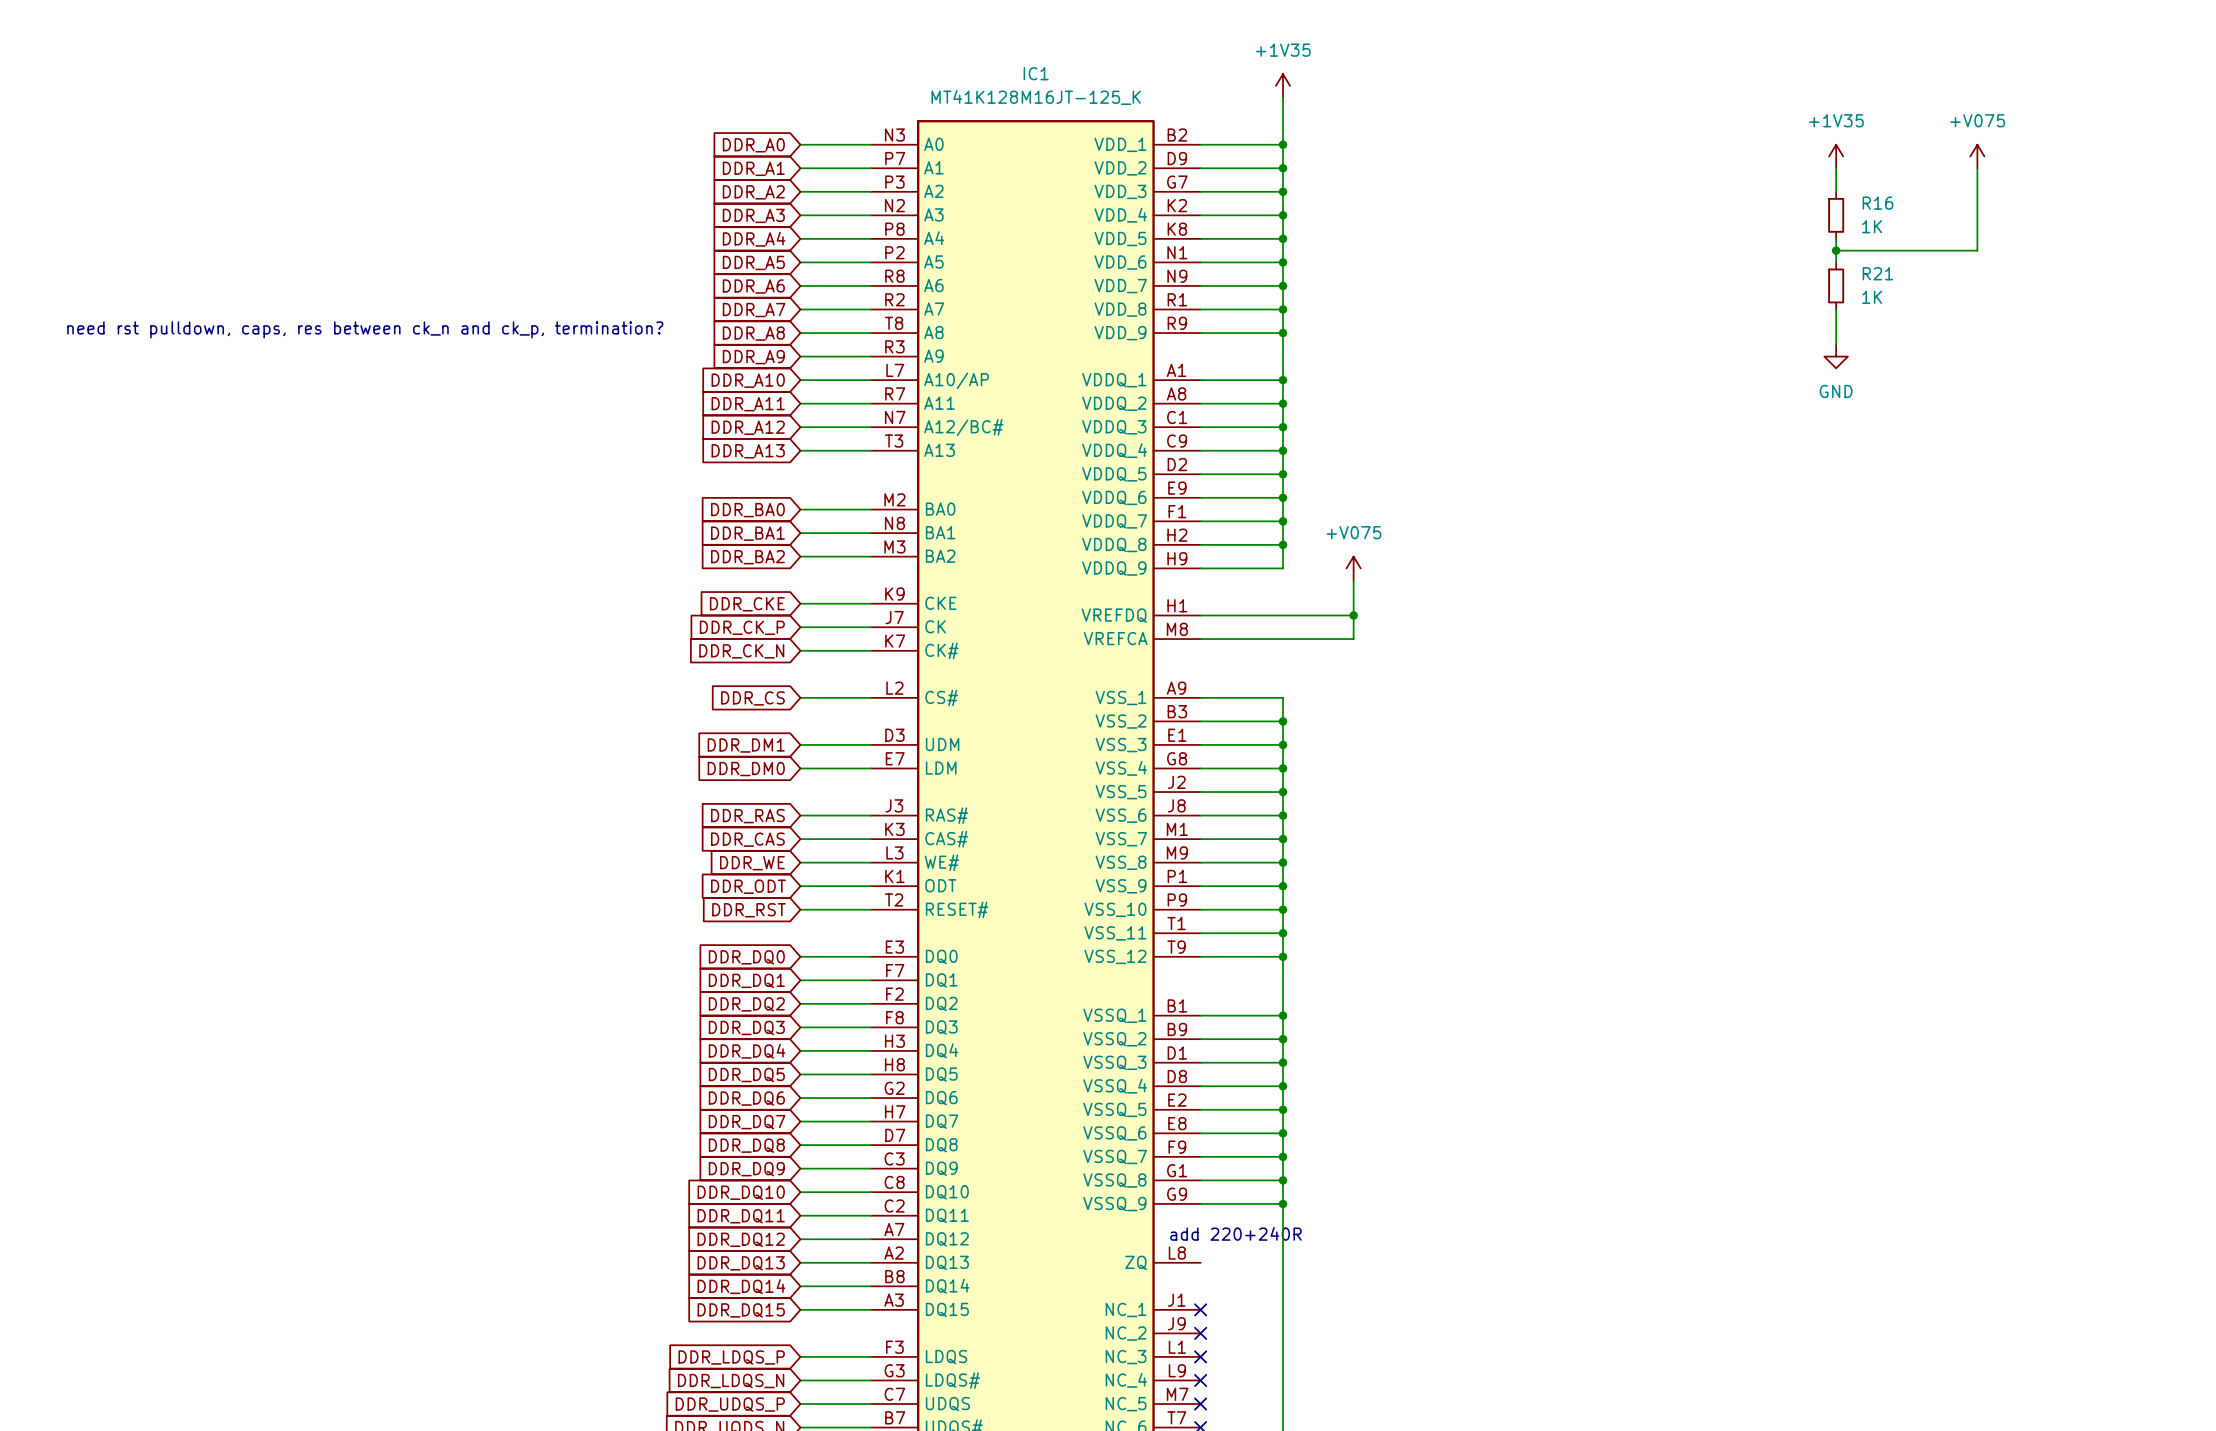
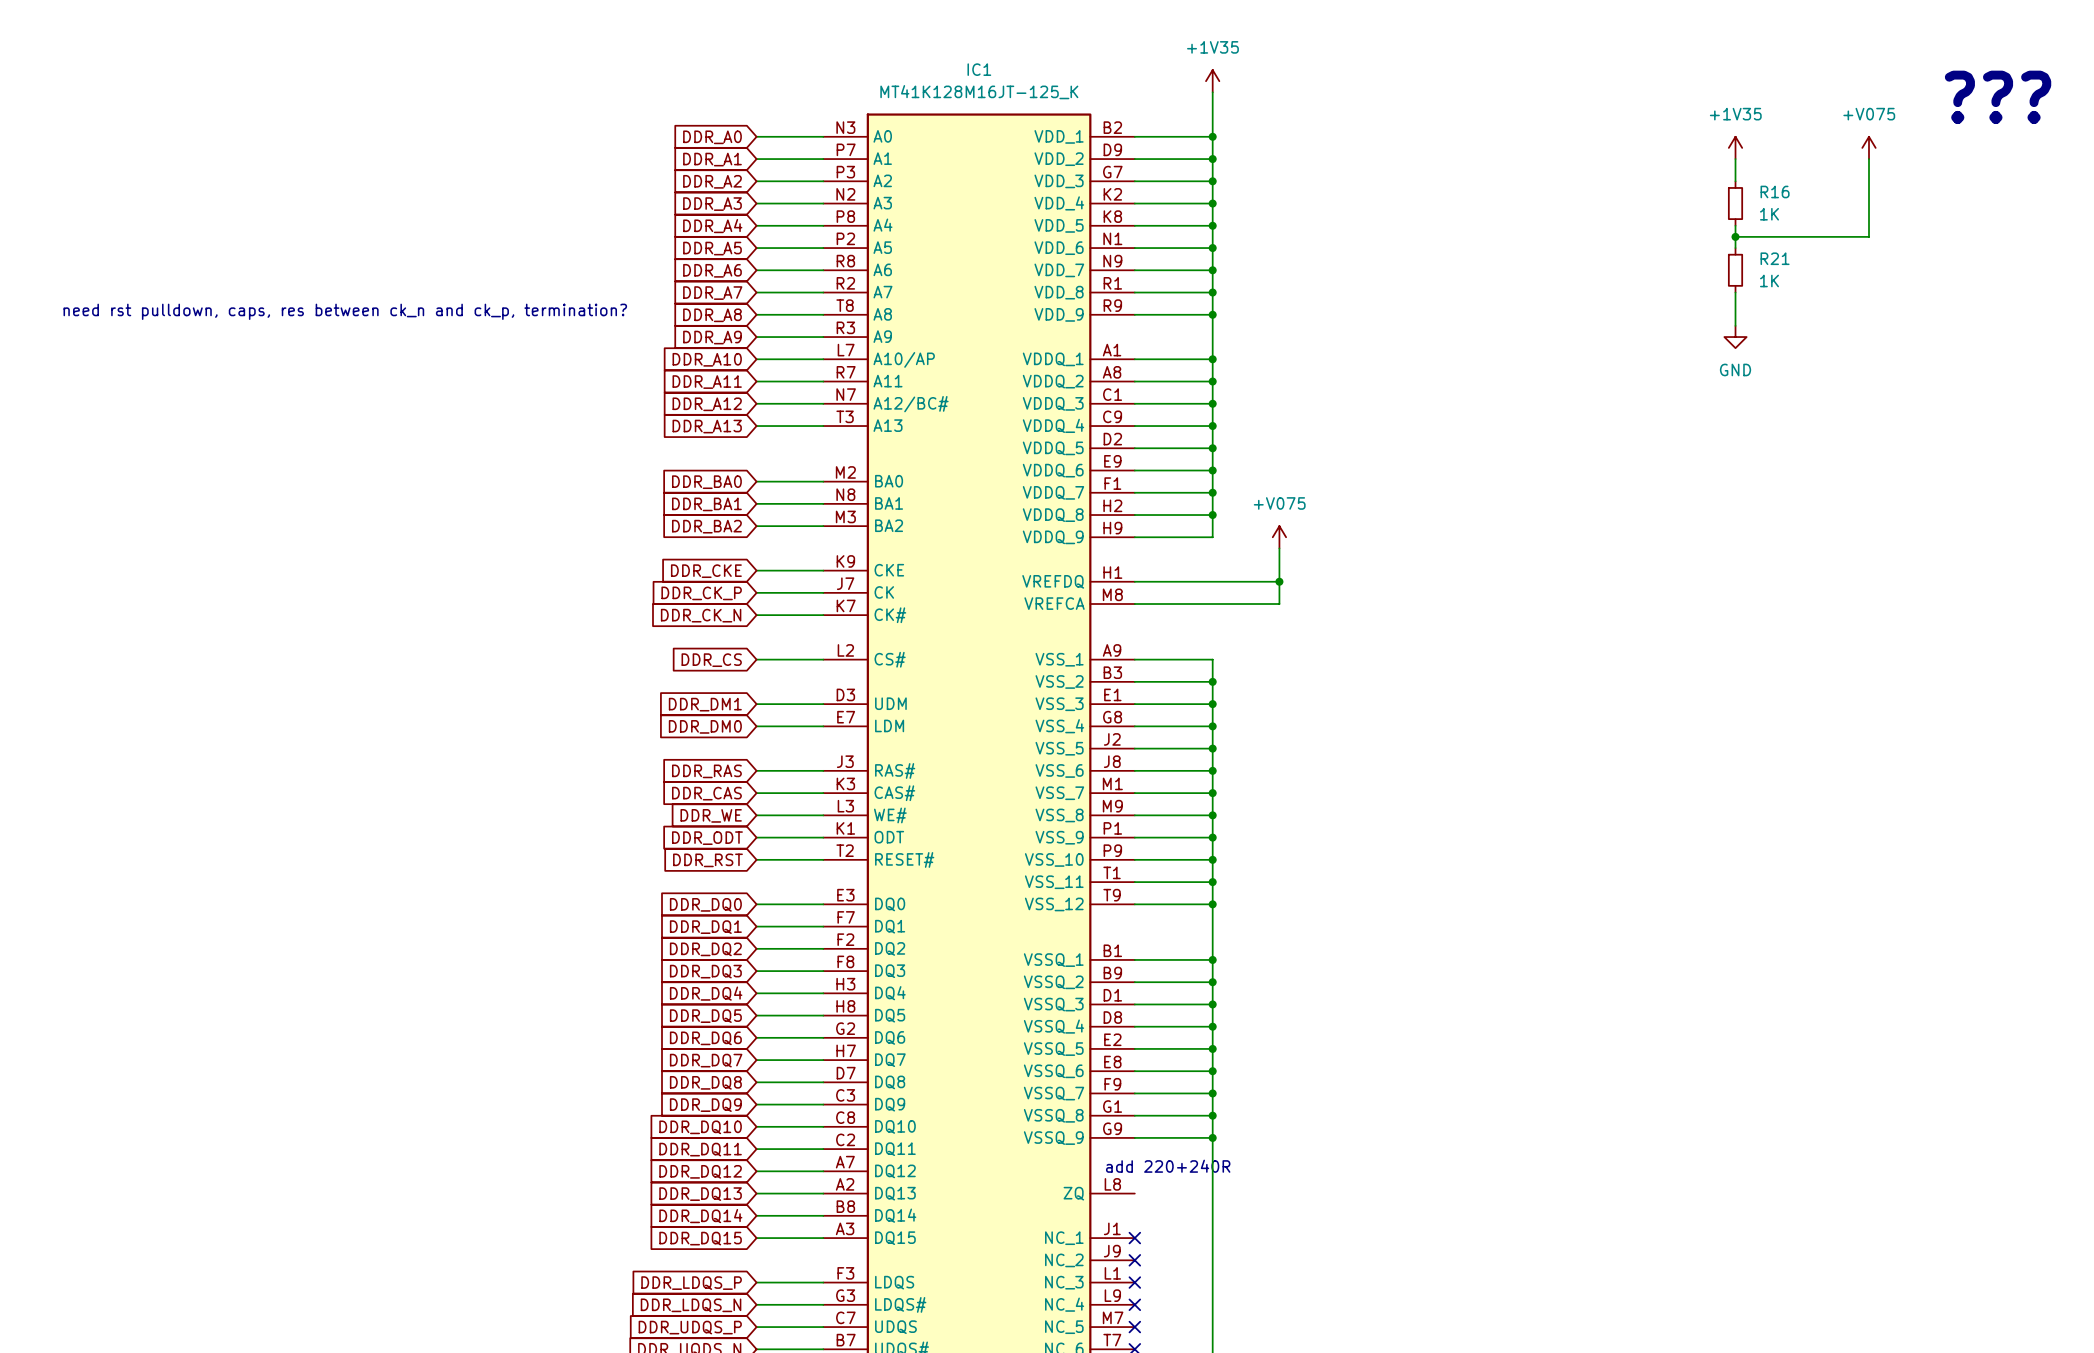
text: none -> ??? (1998, 97)

